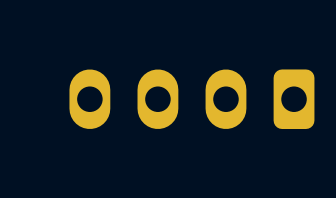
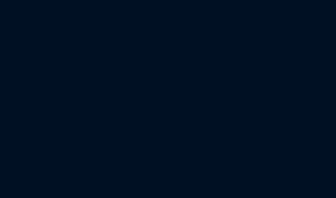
part: (191, 99) -> none

